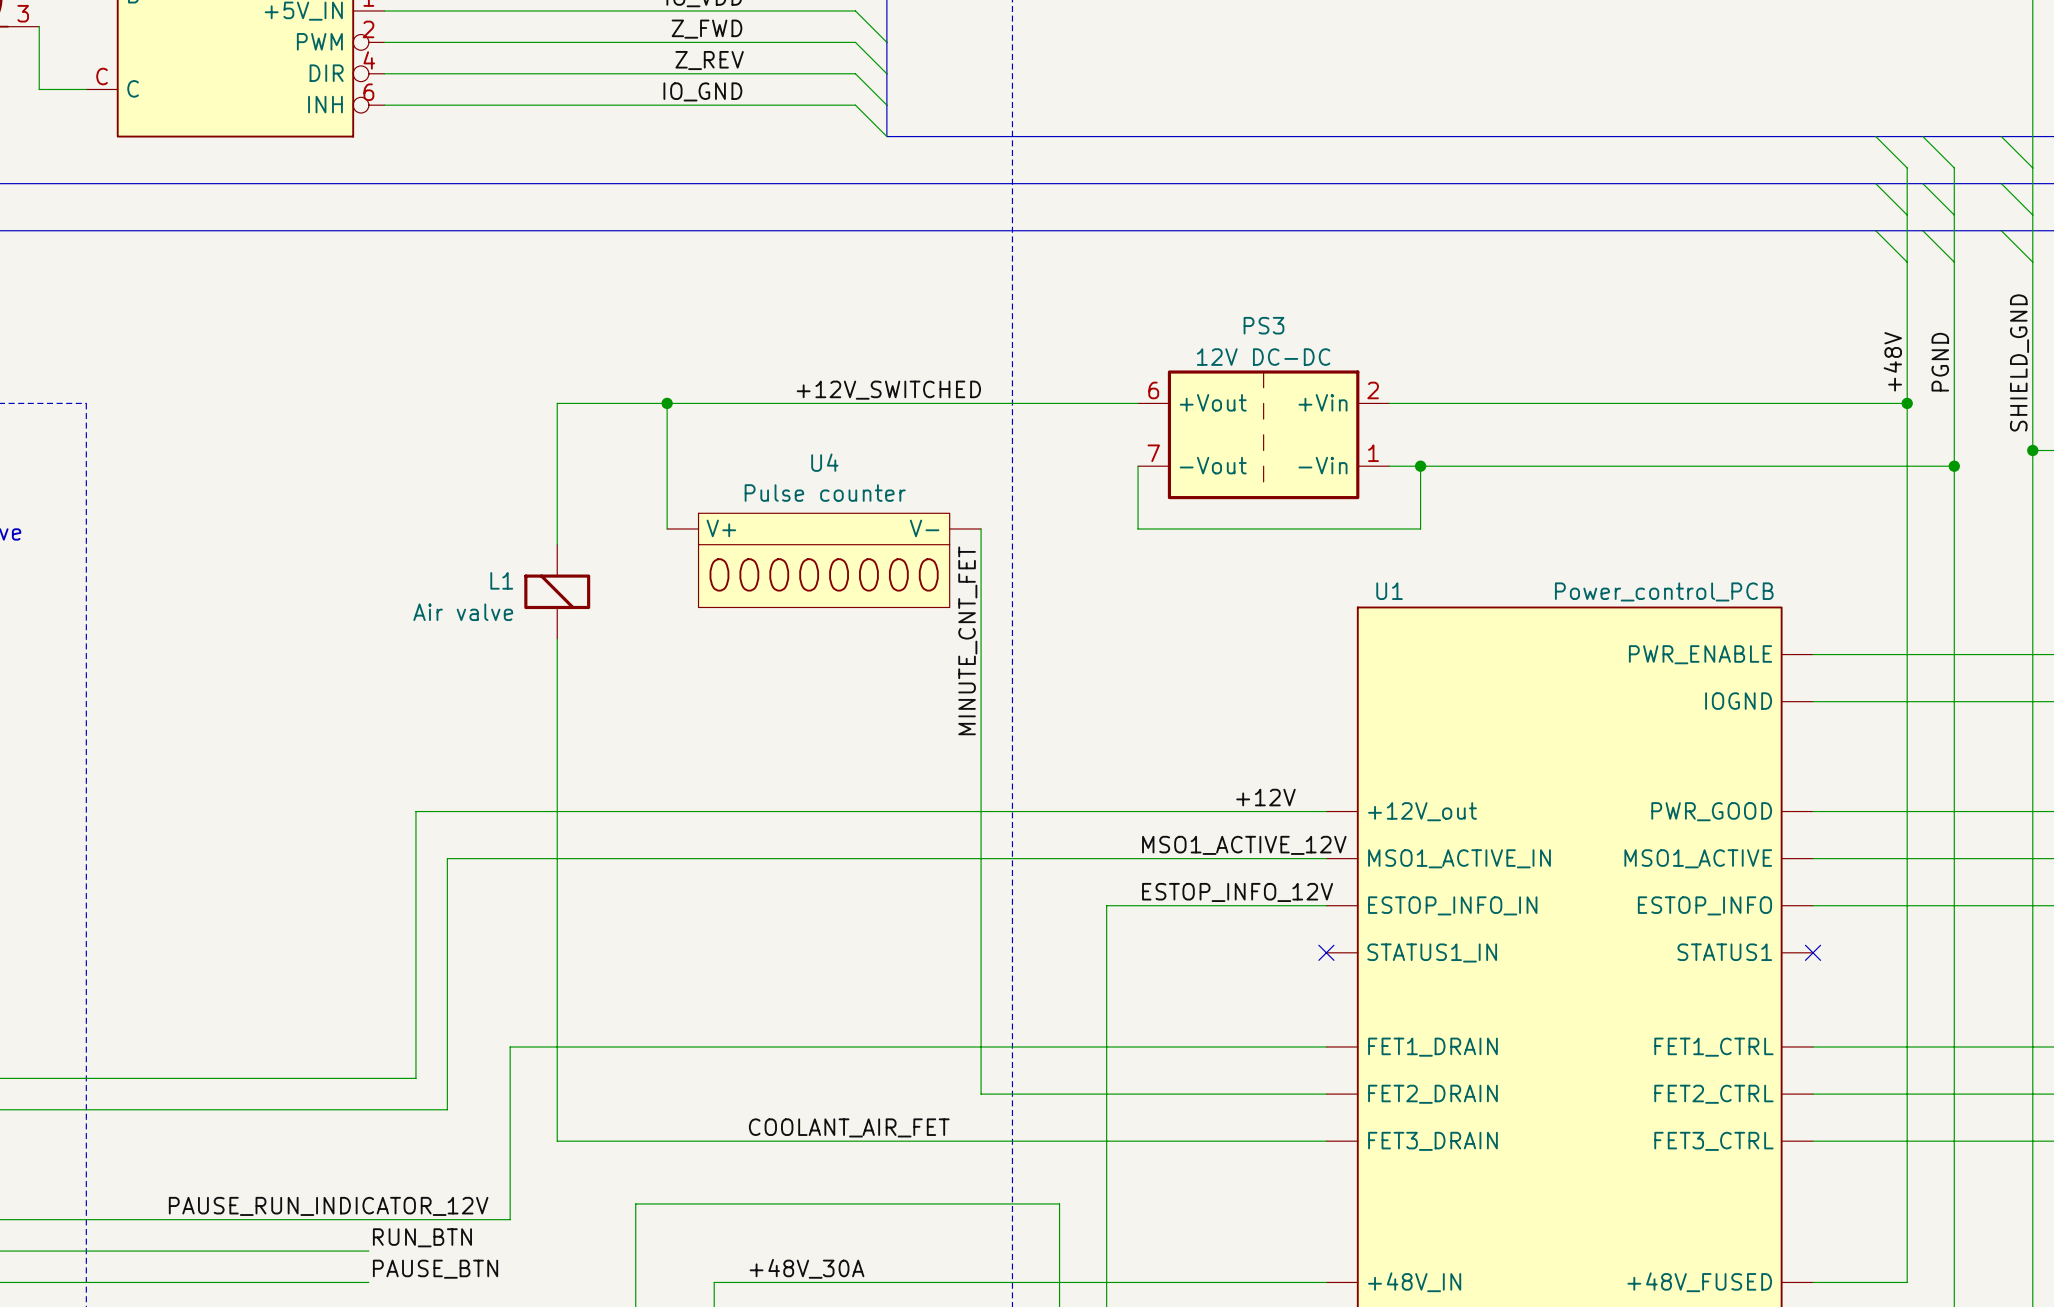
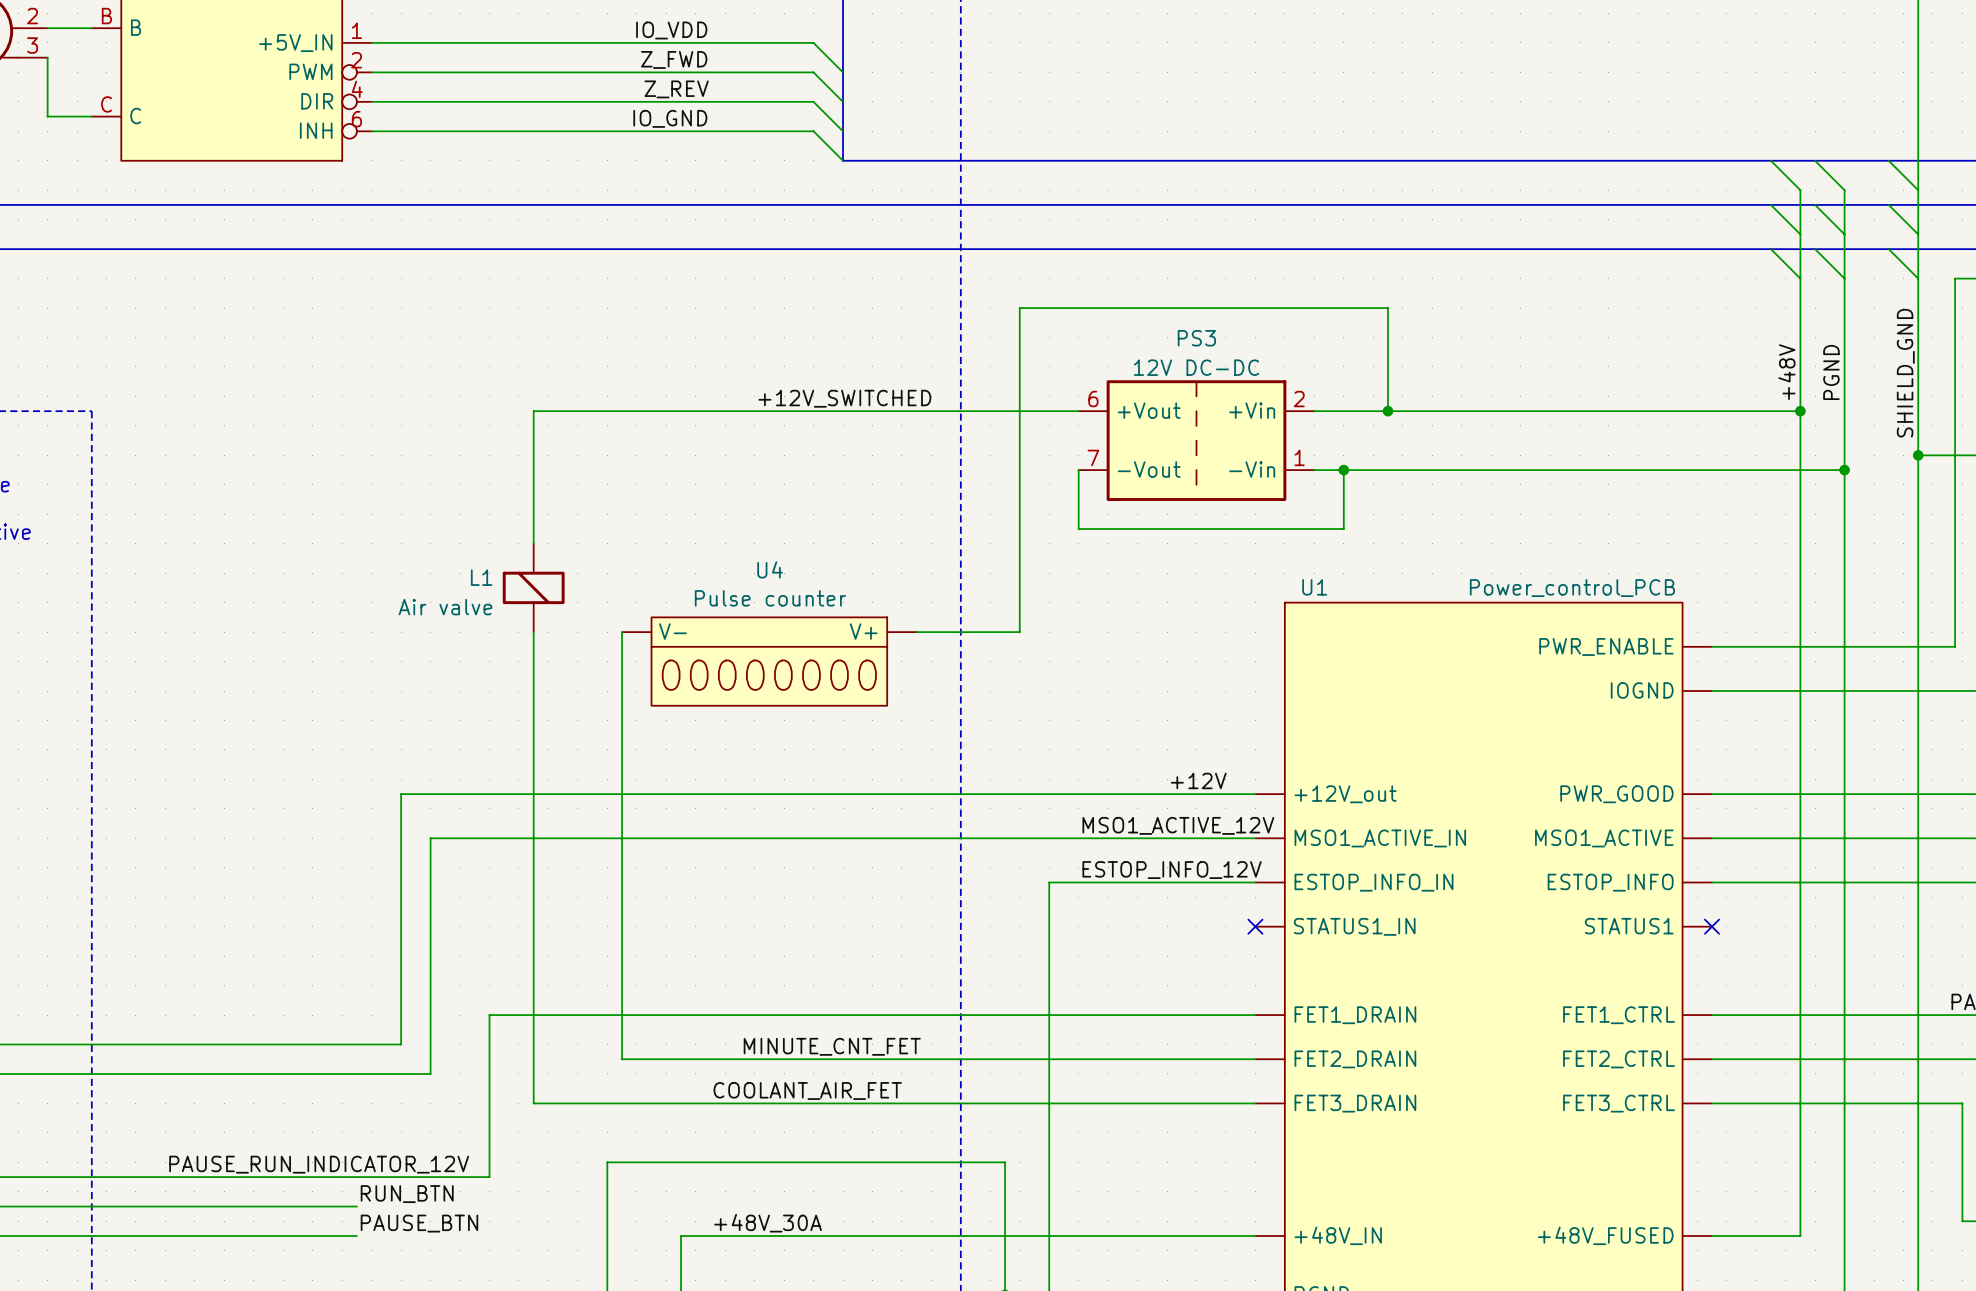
wire: (667, 403) (667, 528) -> none
junction: (667, 403) -> none
wire: none -> (1387, 411) (1387, 308) (1019, 308) (1019, 632) (916, 632)
junction: none -> (1387, 411)
wire: (981, 528) (981, 1094) -> (622, 632) (622, 1059) (931, 1059)
U4 flip: as is (824, 560) -> left-right (769, 661)
label: MINUTE_CNT_FET (967, 640) -> none
label: none -> MINUTE_CNT_FET (832, 1046)

